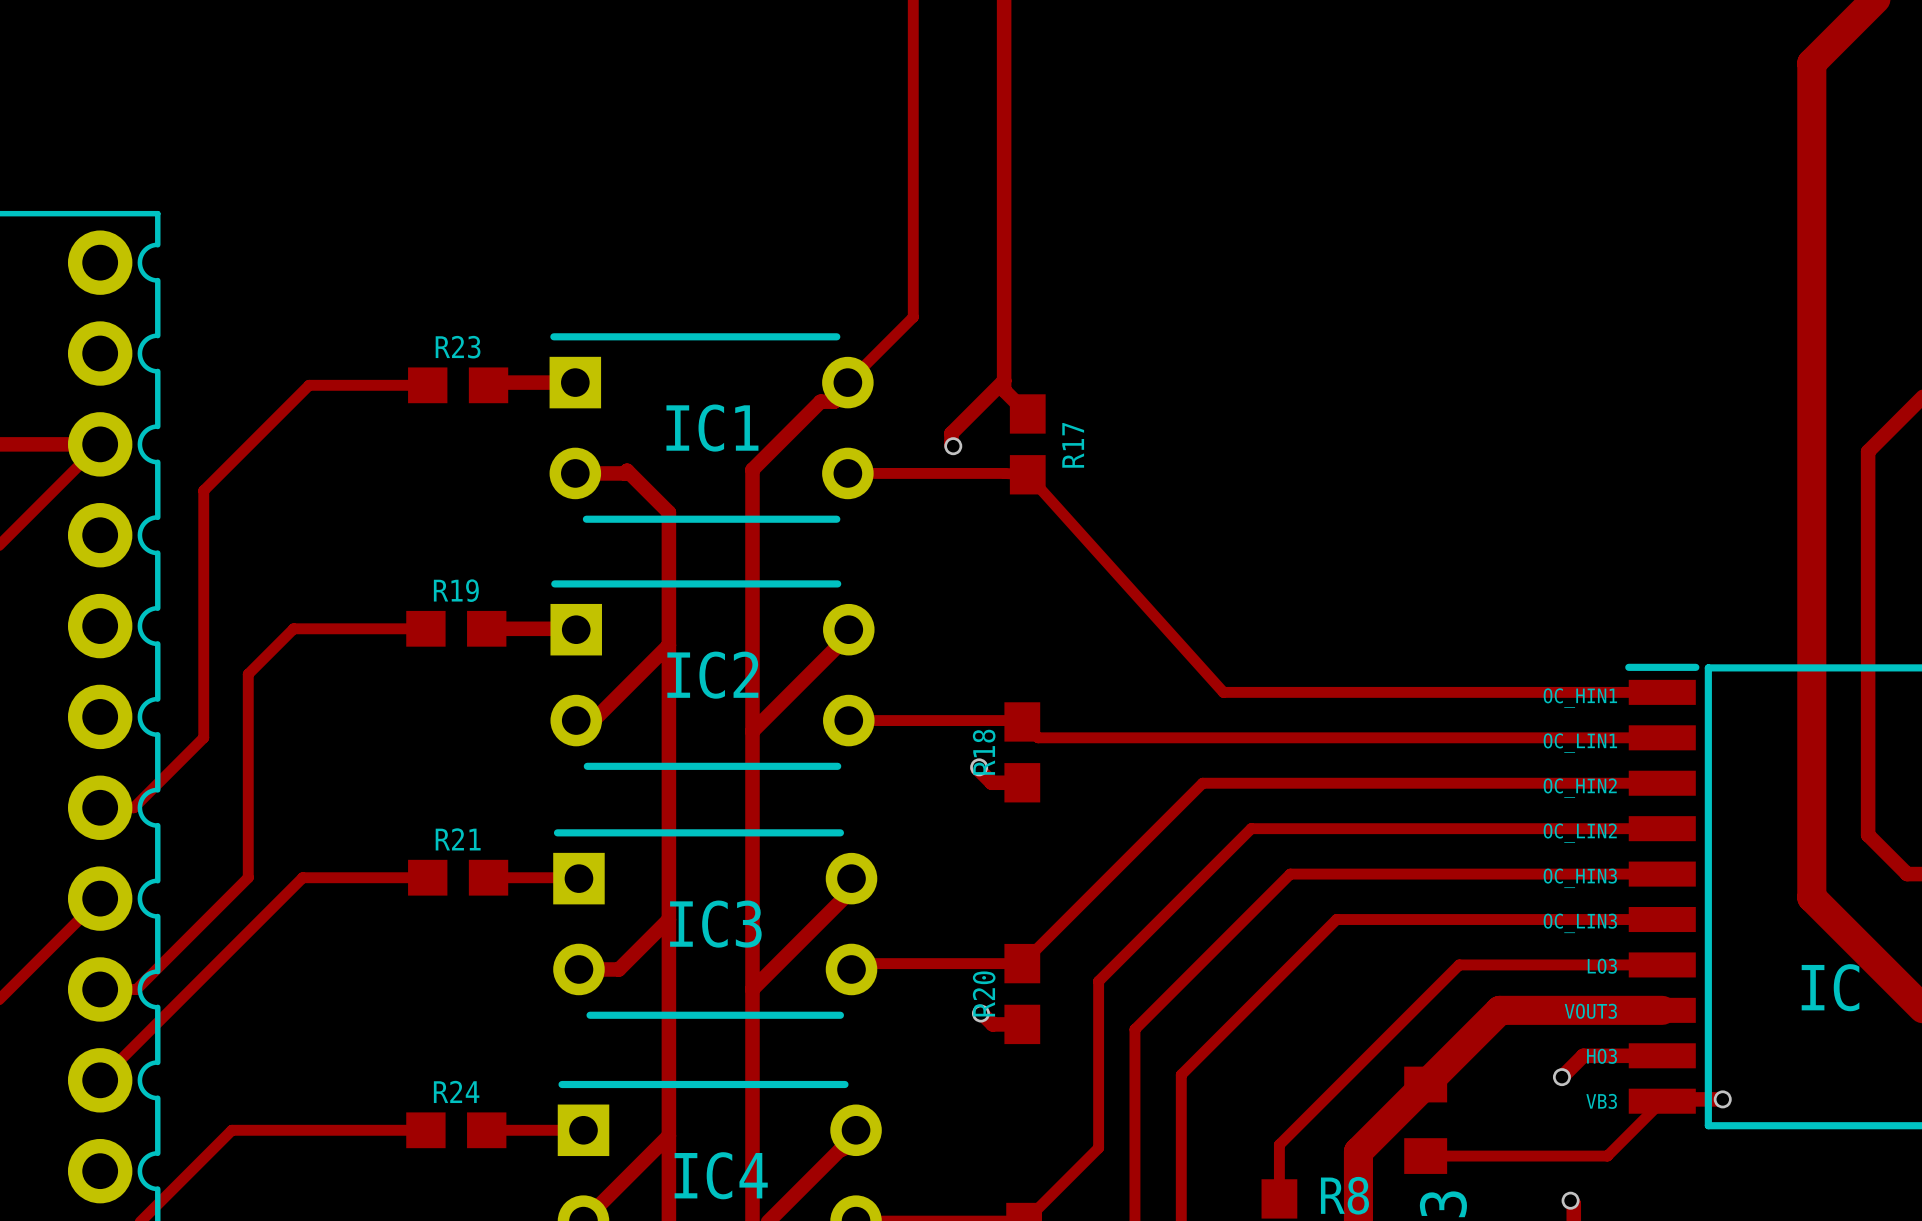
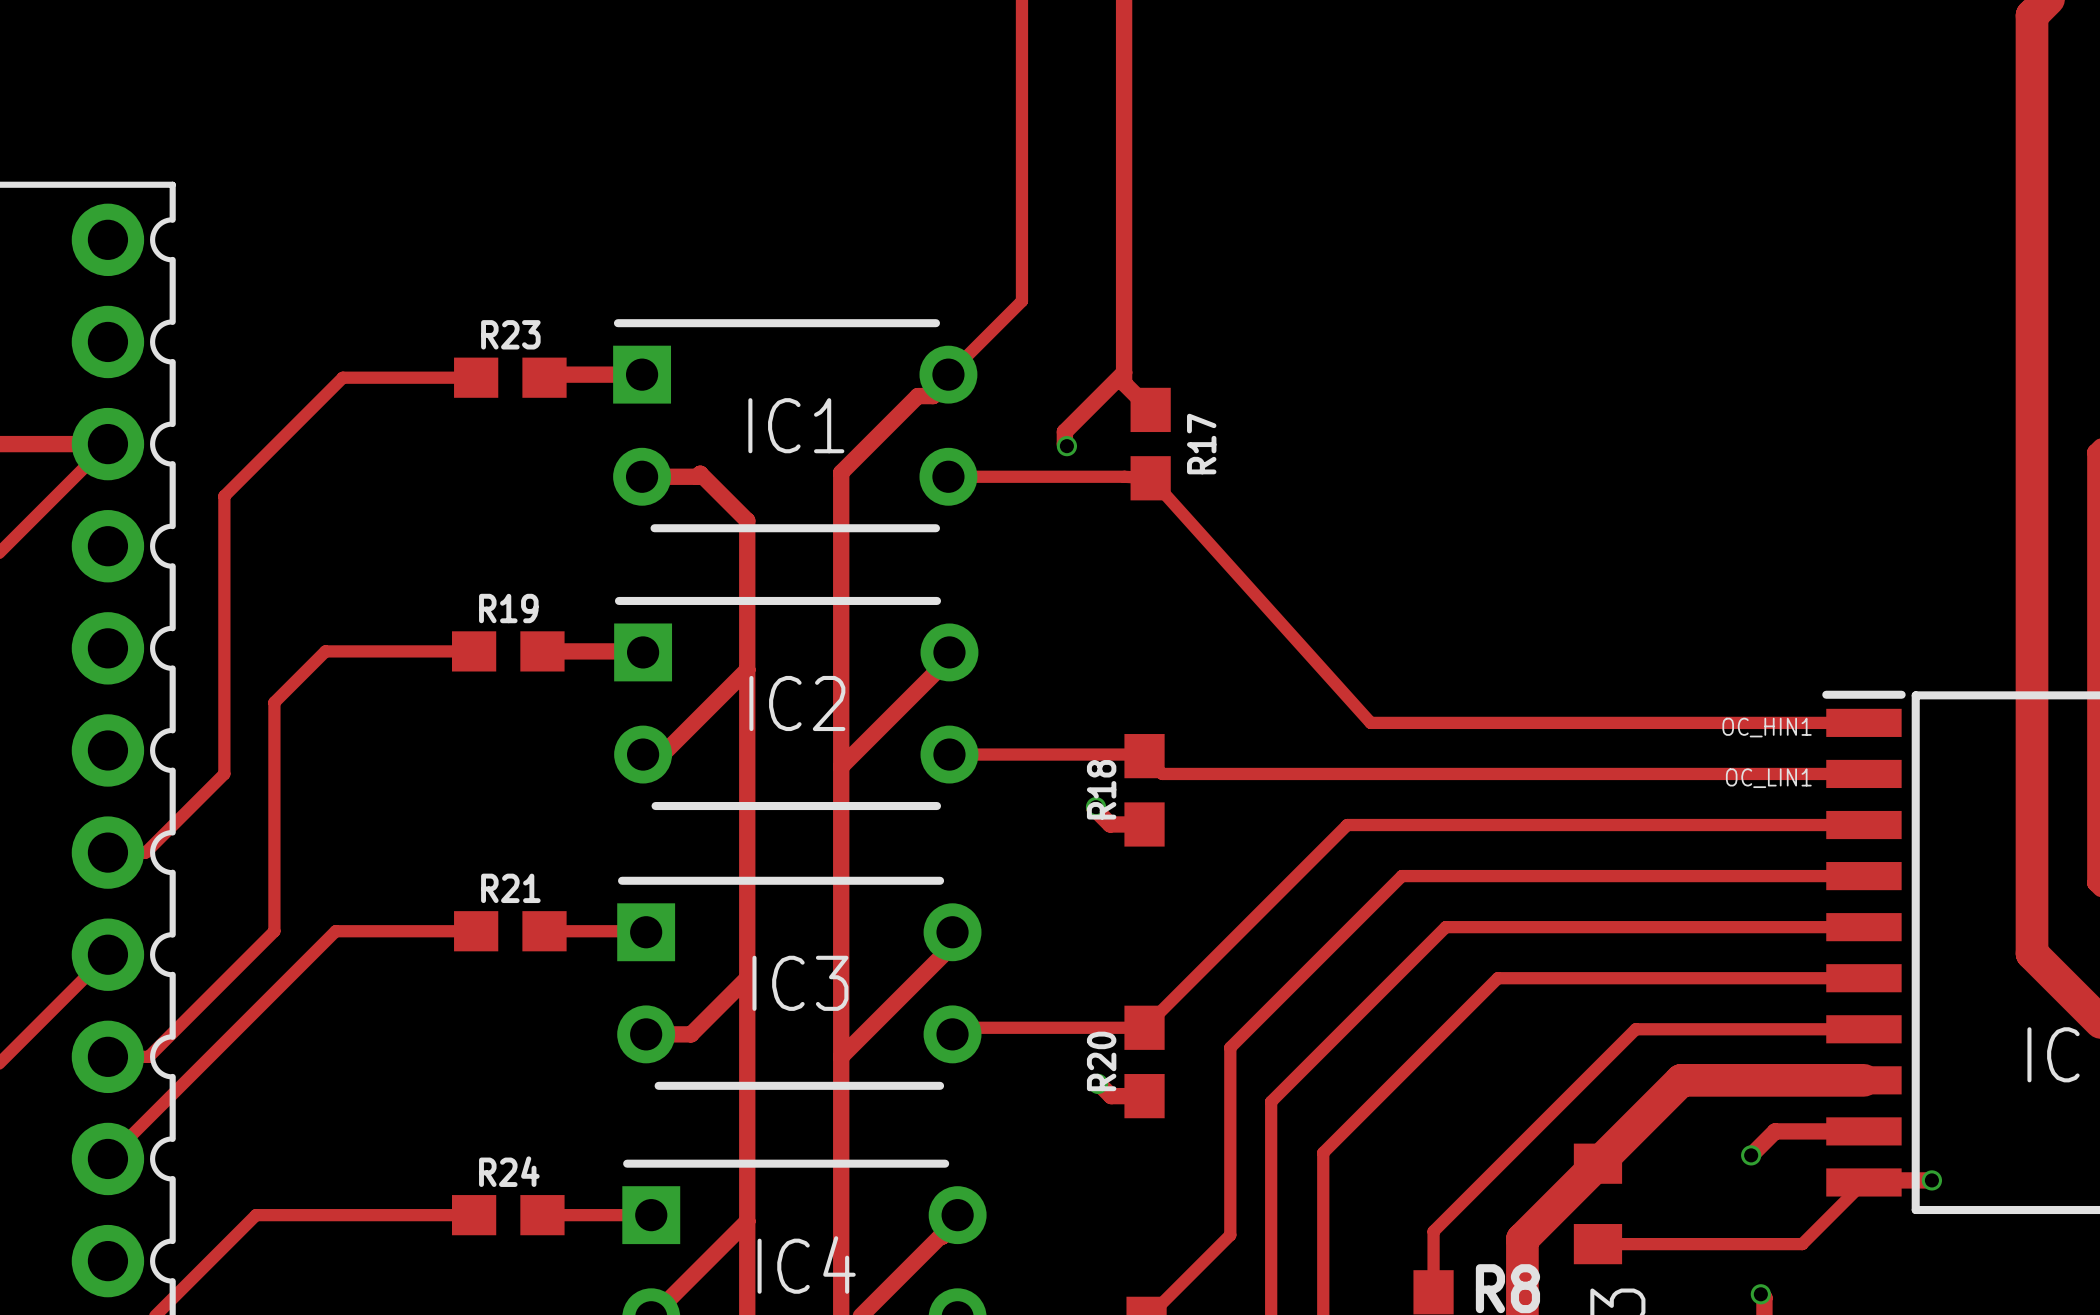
text: OC_HIN2 (1580, 788) -> none
text: OC_LIN2 (1580, 833) -> none
text: OC_HIN3 (1580, 878) -> none
text: OC_LIN3 (1580, 923) -> none
text: LO3 (1602, 966) -> none
text: VOUT3 (1590, 1011) -> none
text: HO3 (1602, 1056) -> none
text: VB3 (1601, 1101) -> none

